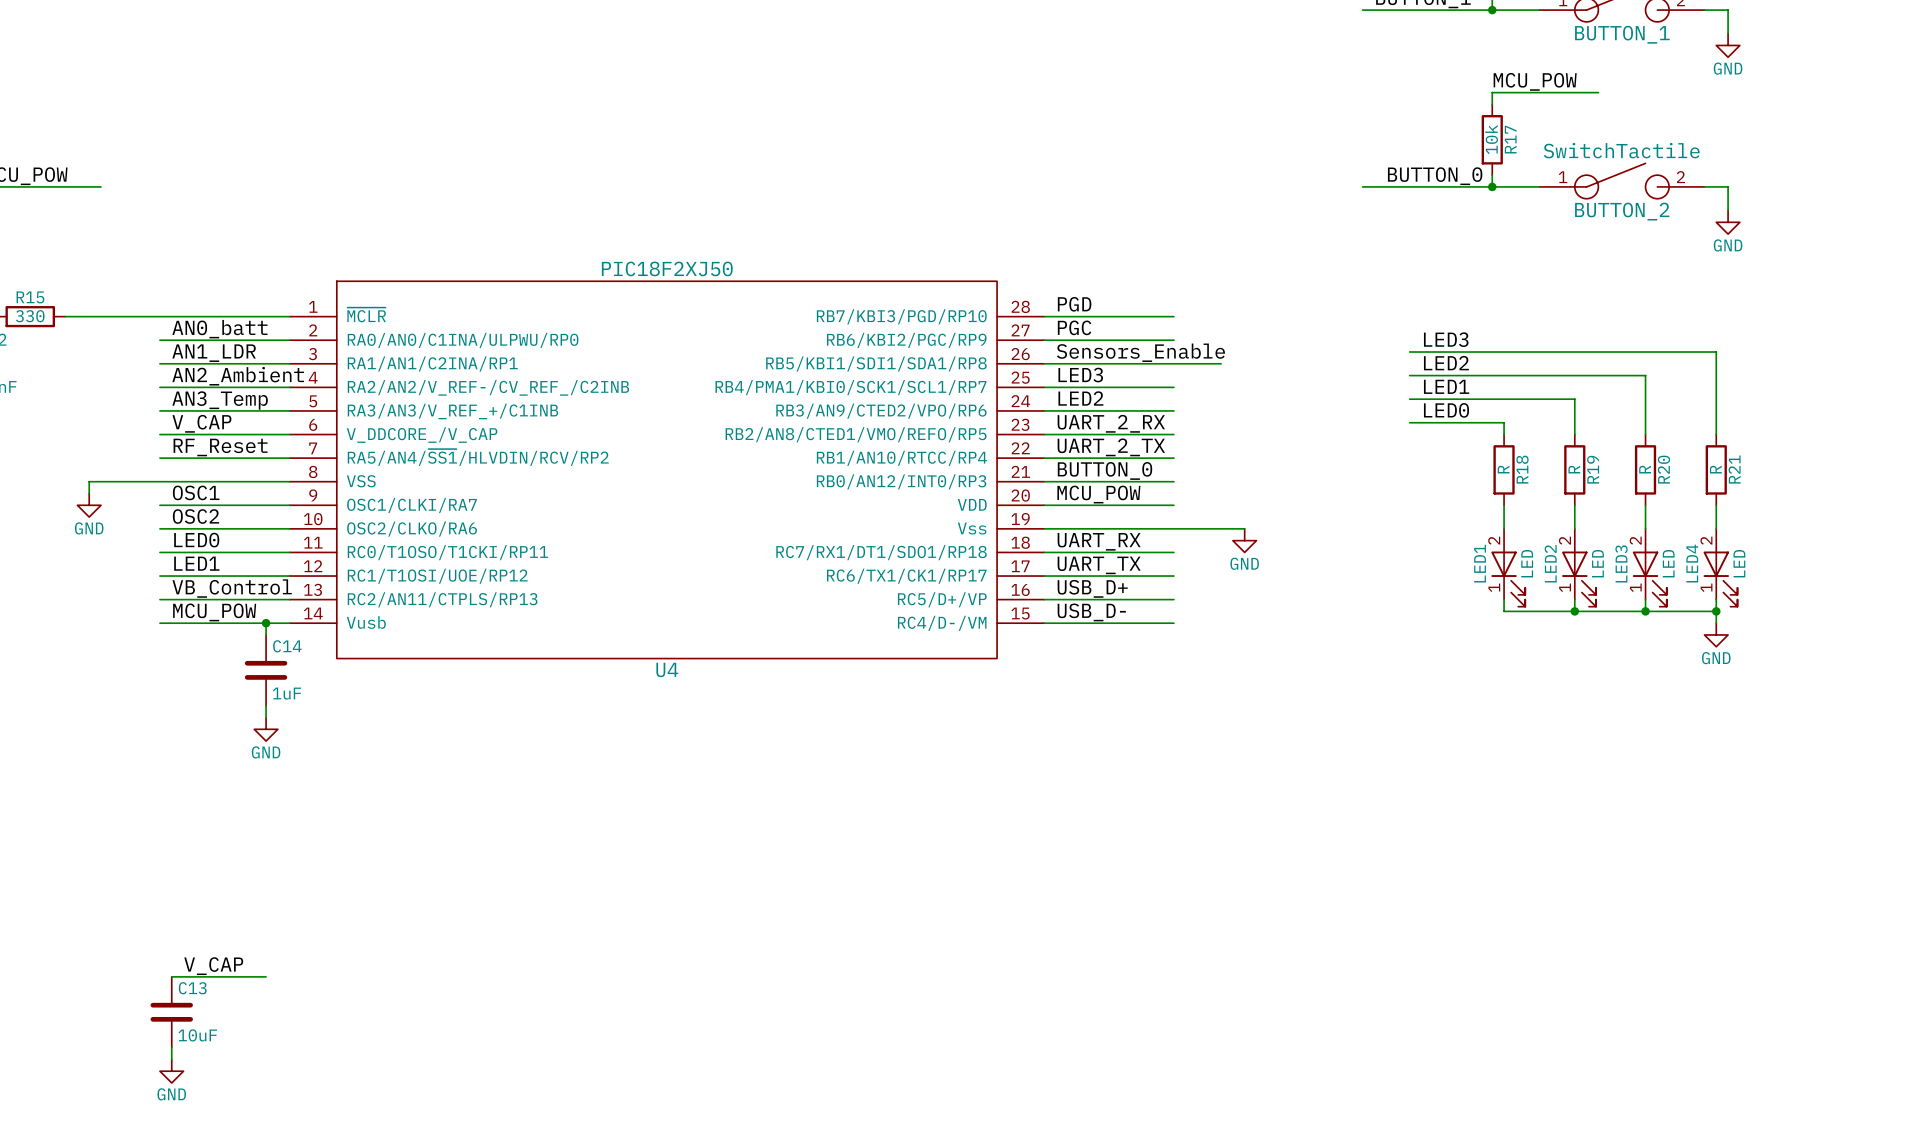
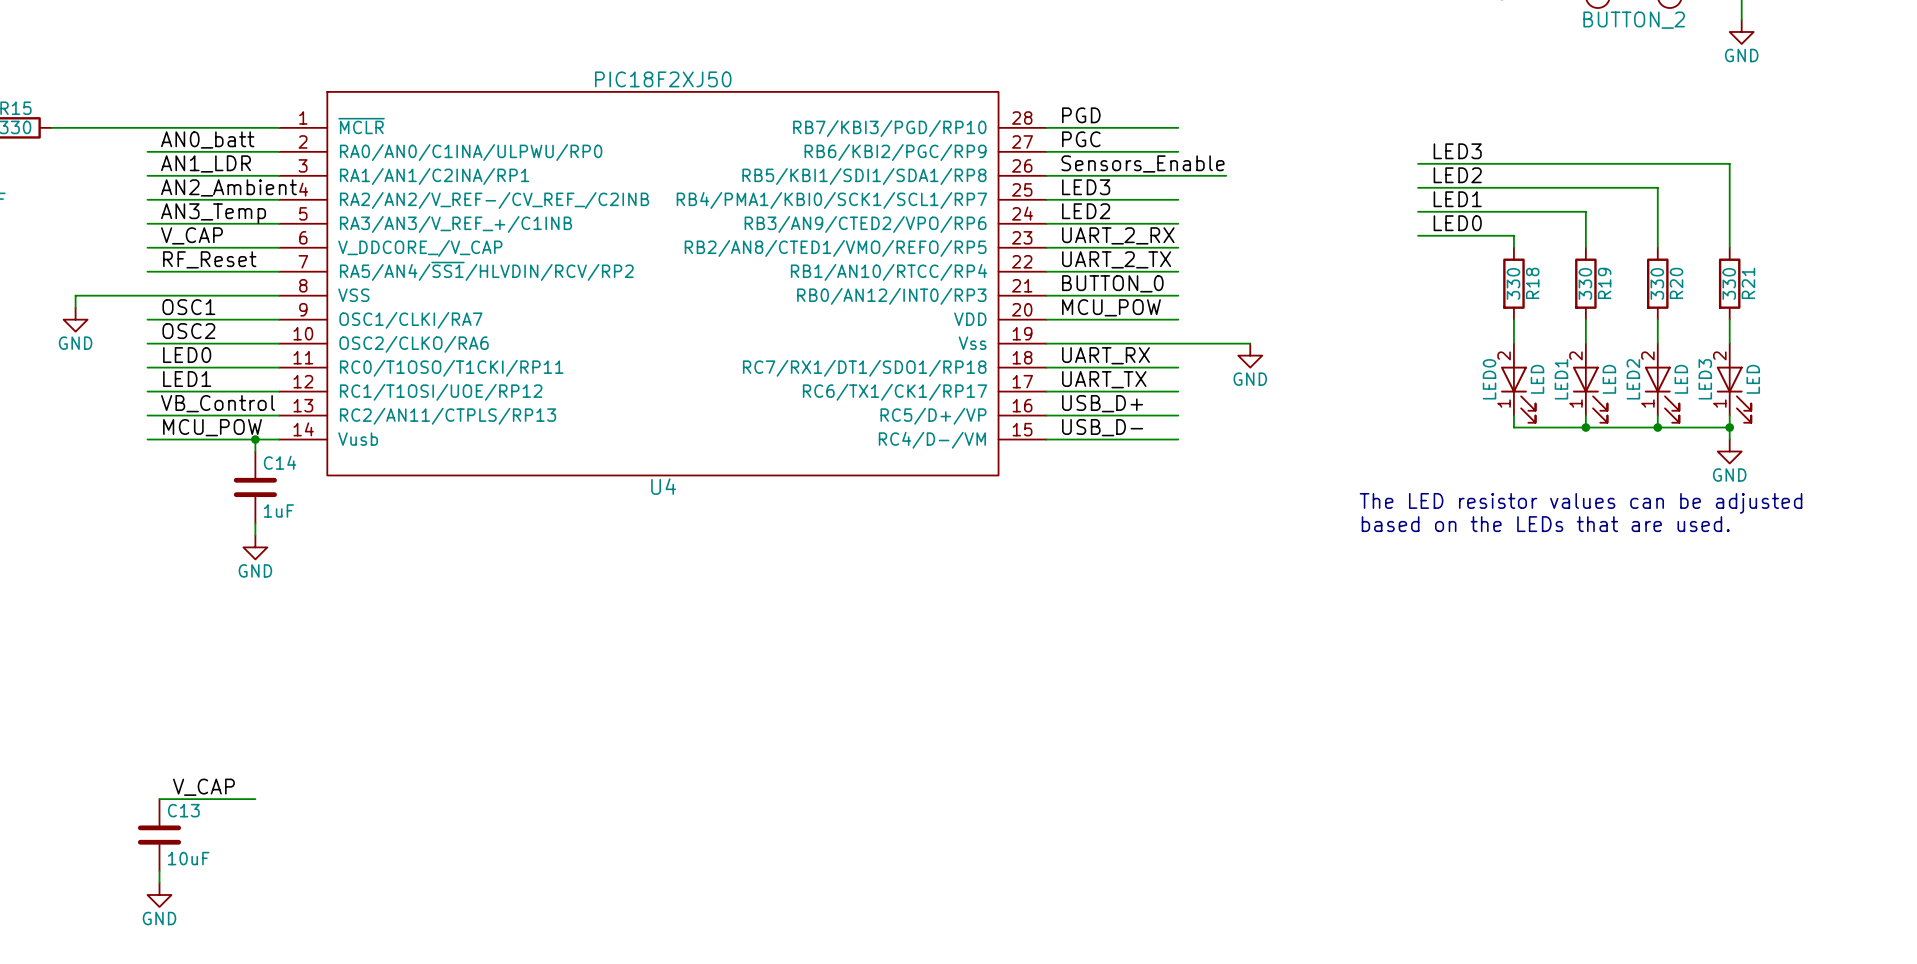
R18 value: R (1503, 469) -> 330 (1513, 283)
R19 value: R (1574, 469) -> 330 (1585, 283)
R20 value: R (1645, 469) -> 330 (1657, 283)
R21 value: R (1715, 469) -> 330 (1729, 283)
LED1 name: LED1 (1480, 563) -> LED0 (1489, 379)
LED2 name: LED2 (1550, 563) -> LED1 (1561, 379)
LED3 name: LED3 (1621, 563) -> LED2 (1633, 379)
LED4 name: LED4 (1692, 563) -> LED3 (1705, 379)
text: none -> The LED resistor values can be adjusted (1580, 503)
text: none -> based on the LEDs that are used. (1545, 524)

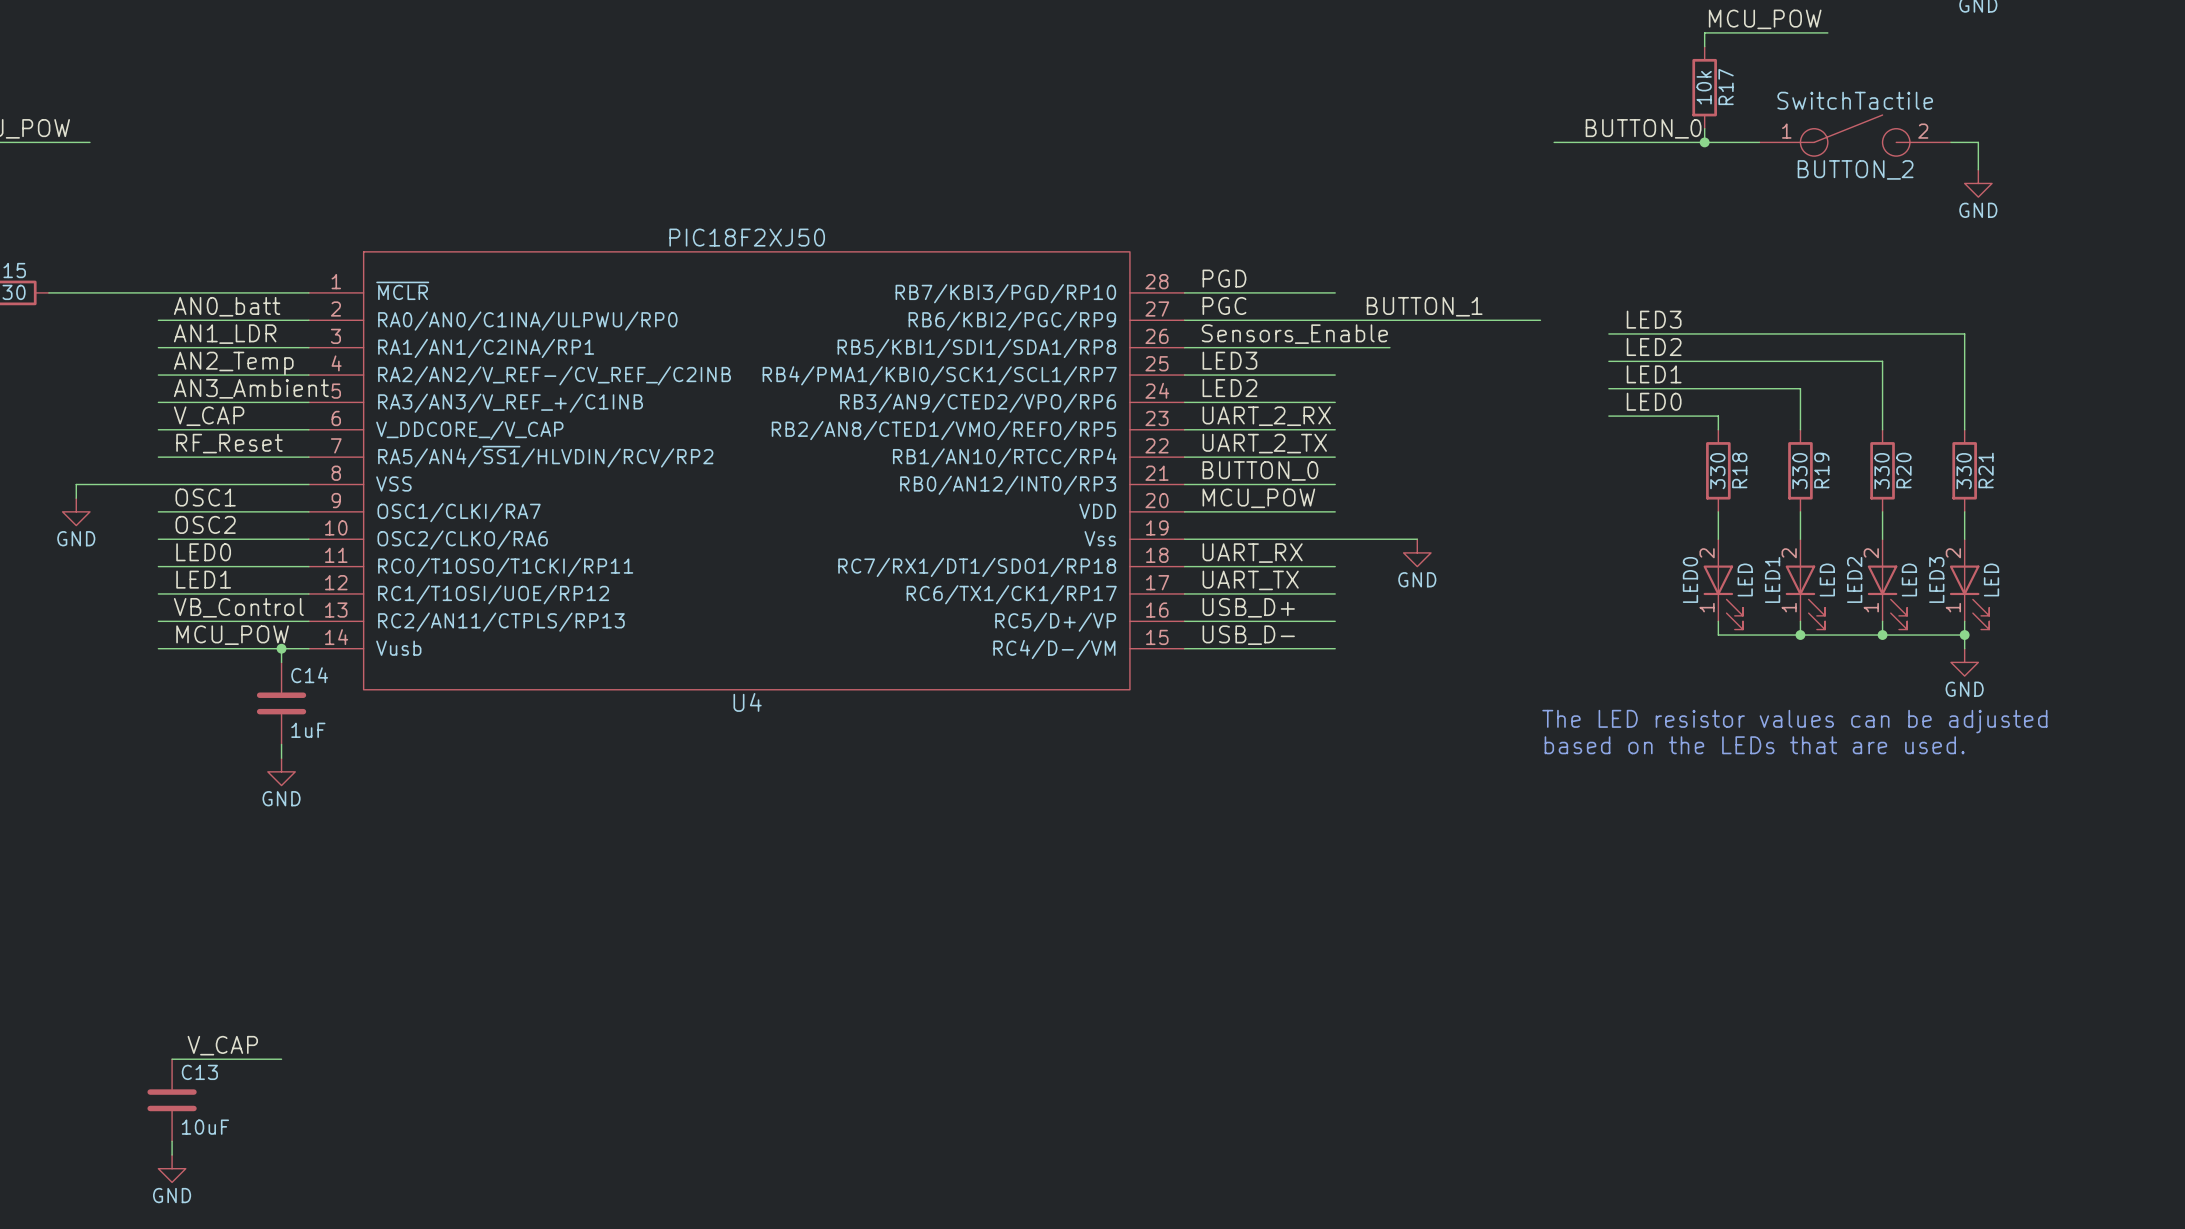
label: none -> BUTTON_1 (1424, 306)
wire: none -> (1335, 320) (1540, 320)
label: AN2_Ambient (228, 187) -> AN2_Temp (233, 363)
label: AN3_Temp (213, 213) -> AN3_Ambient (251, 388)

